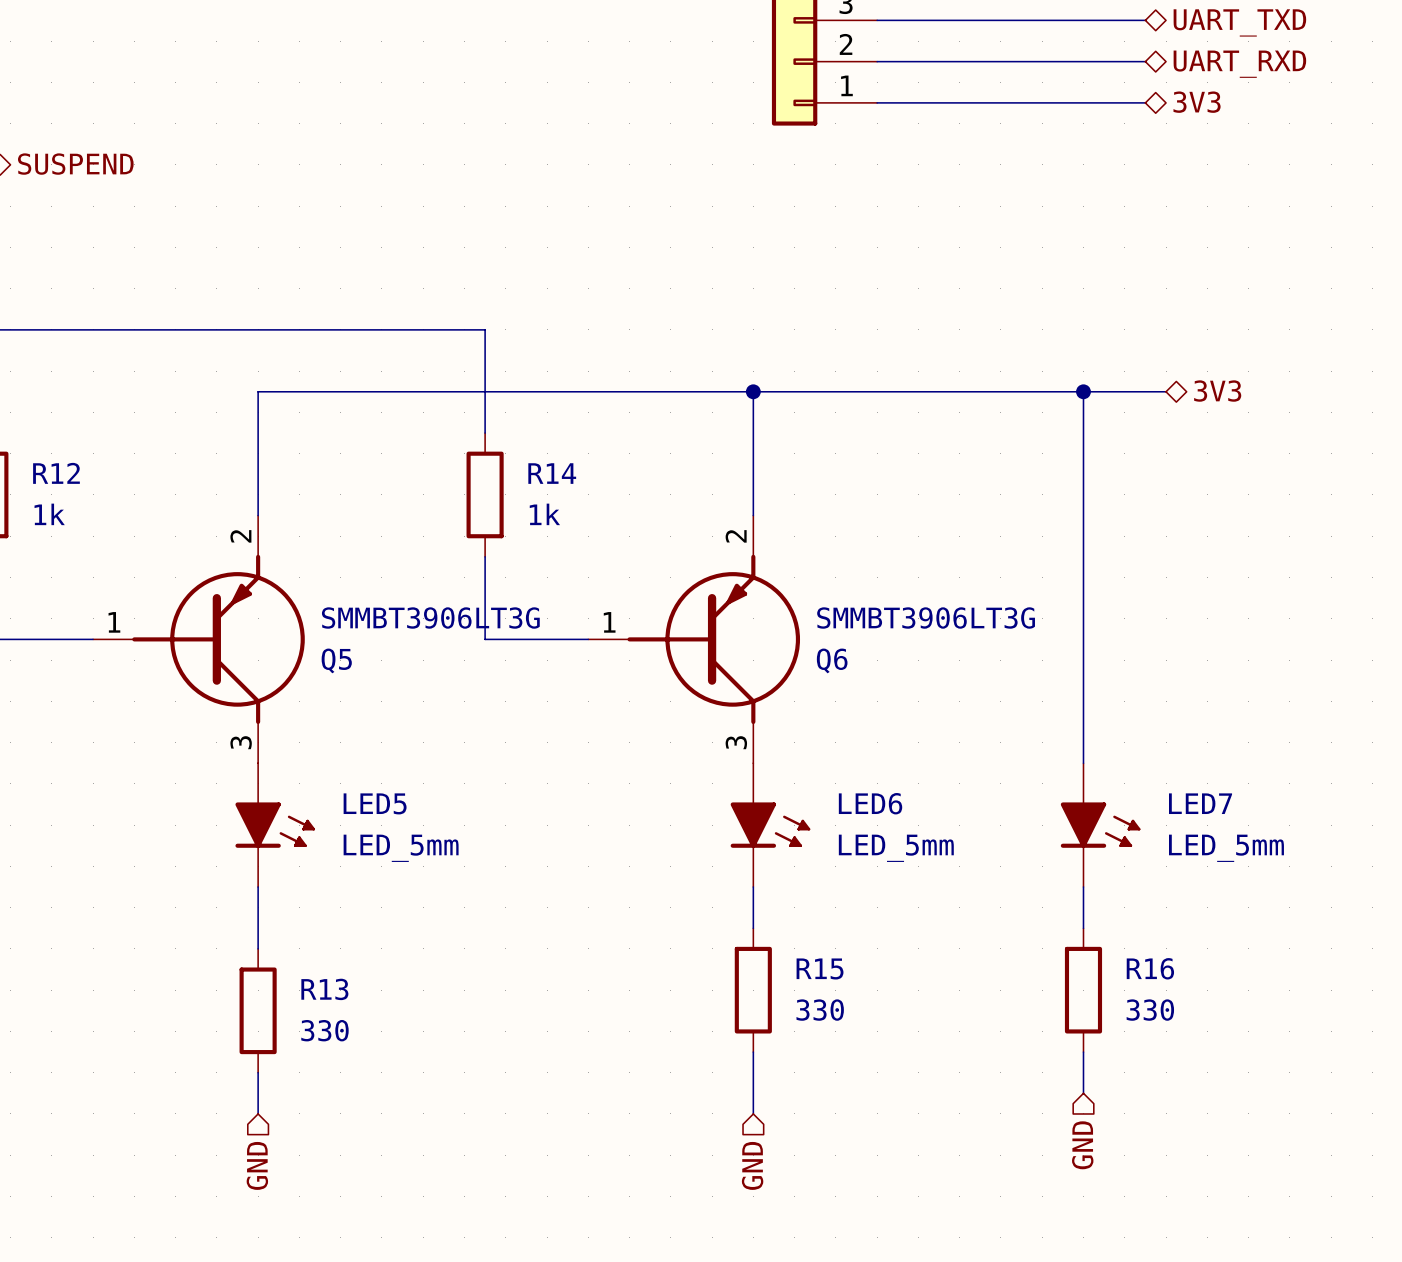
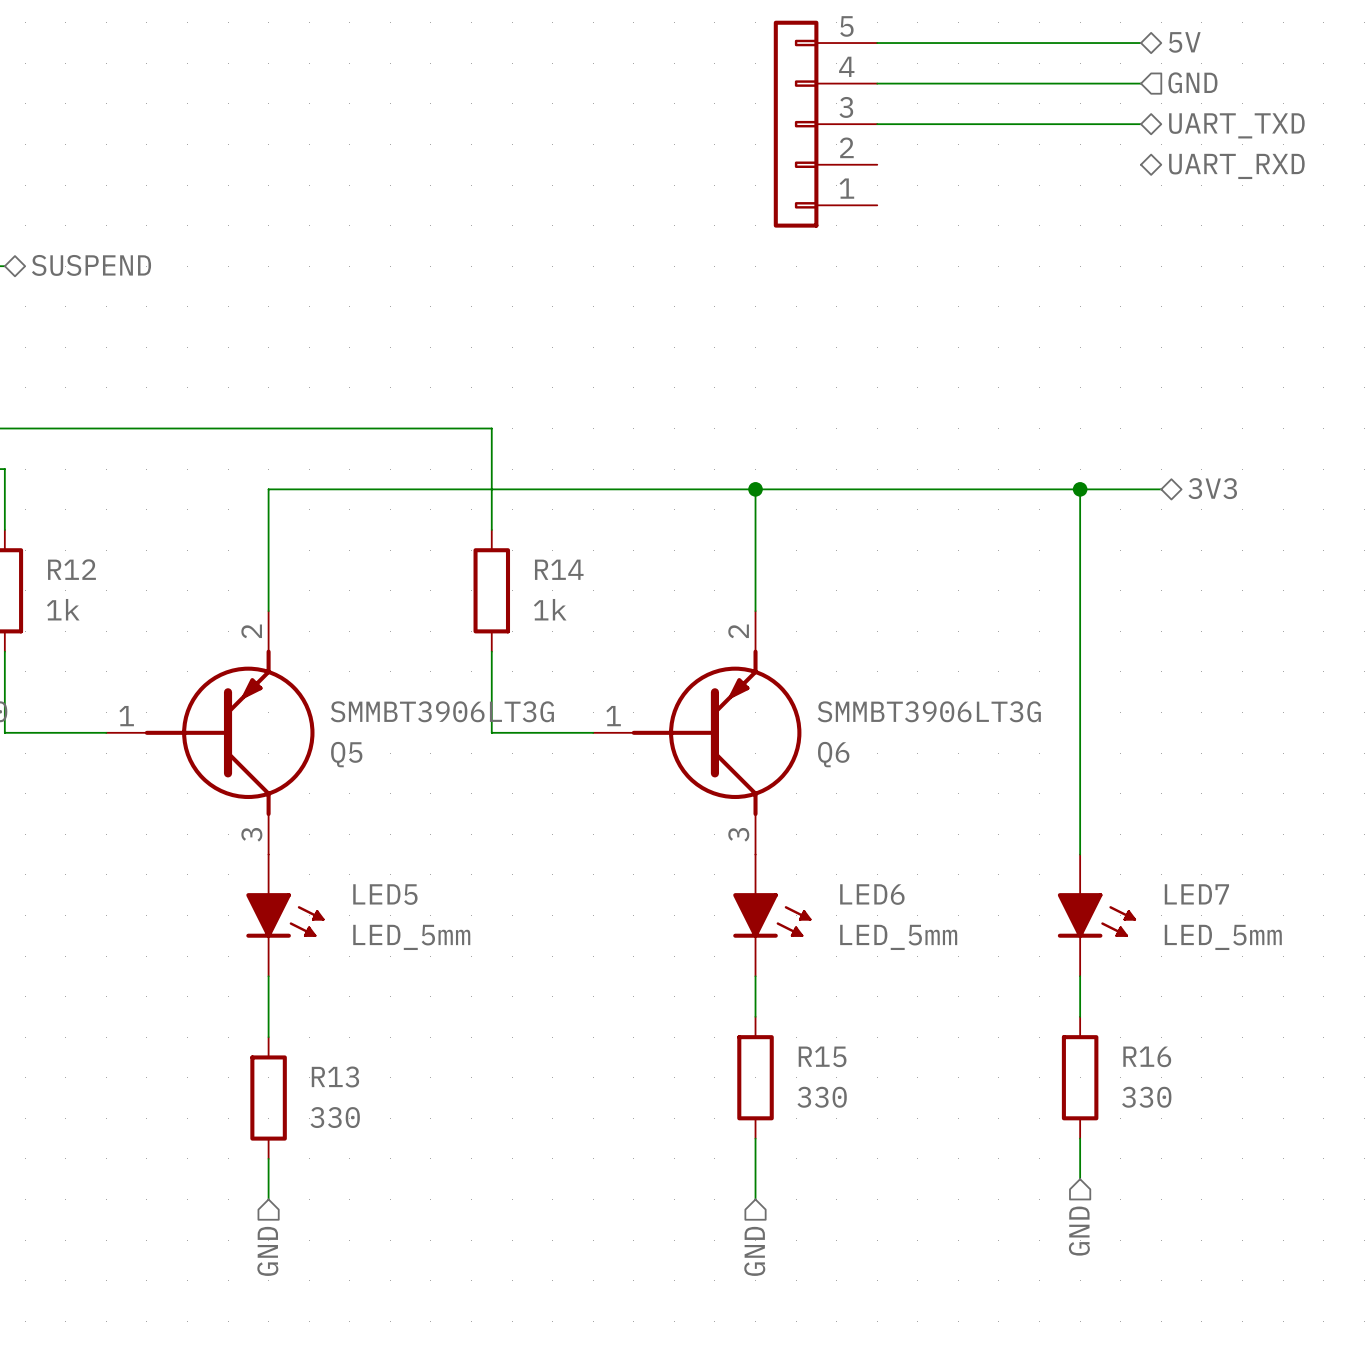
wire: (877, 61) (1145, 61) -> none
wire: (877, 102) (1145, 102) -> none
hierarchical label: 3V3 (1197, 102) -> none

